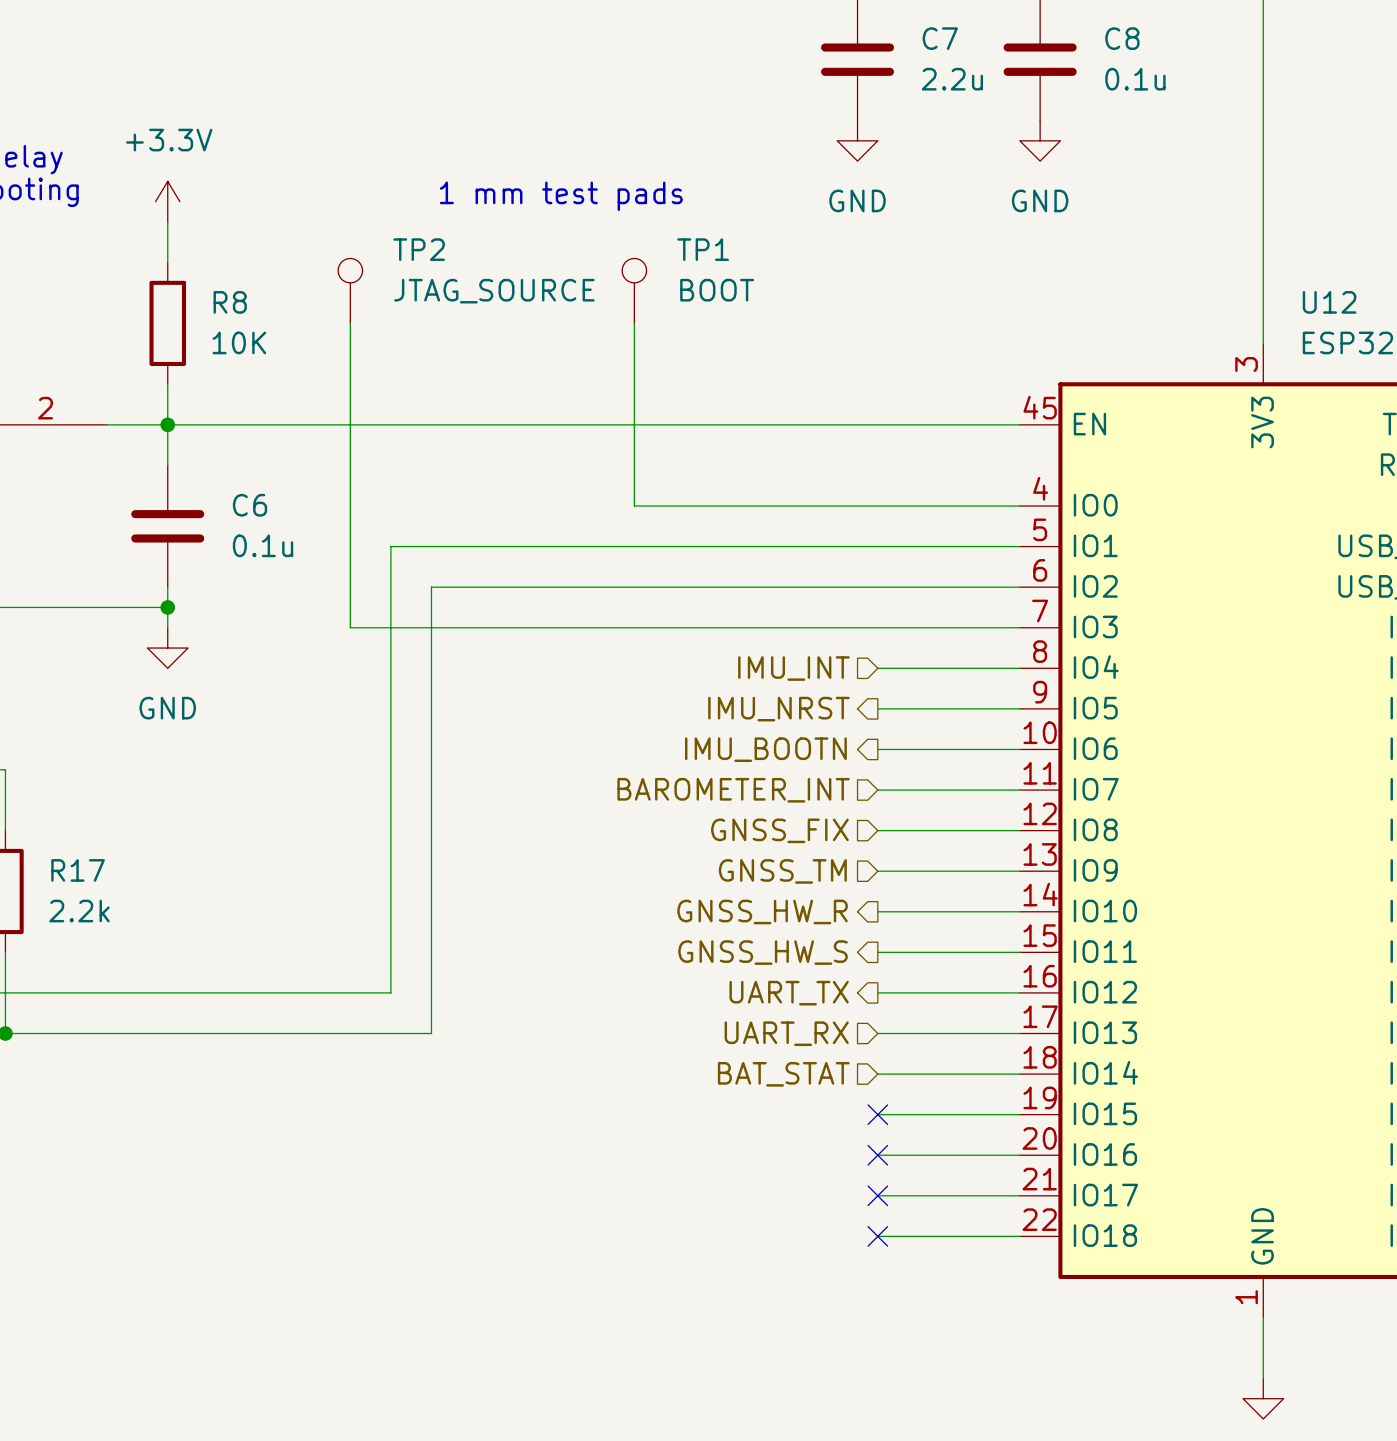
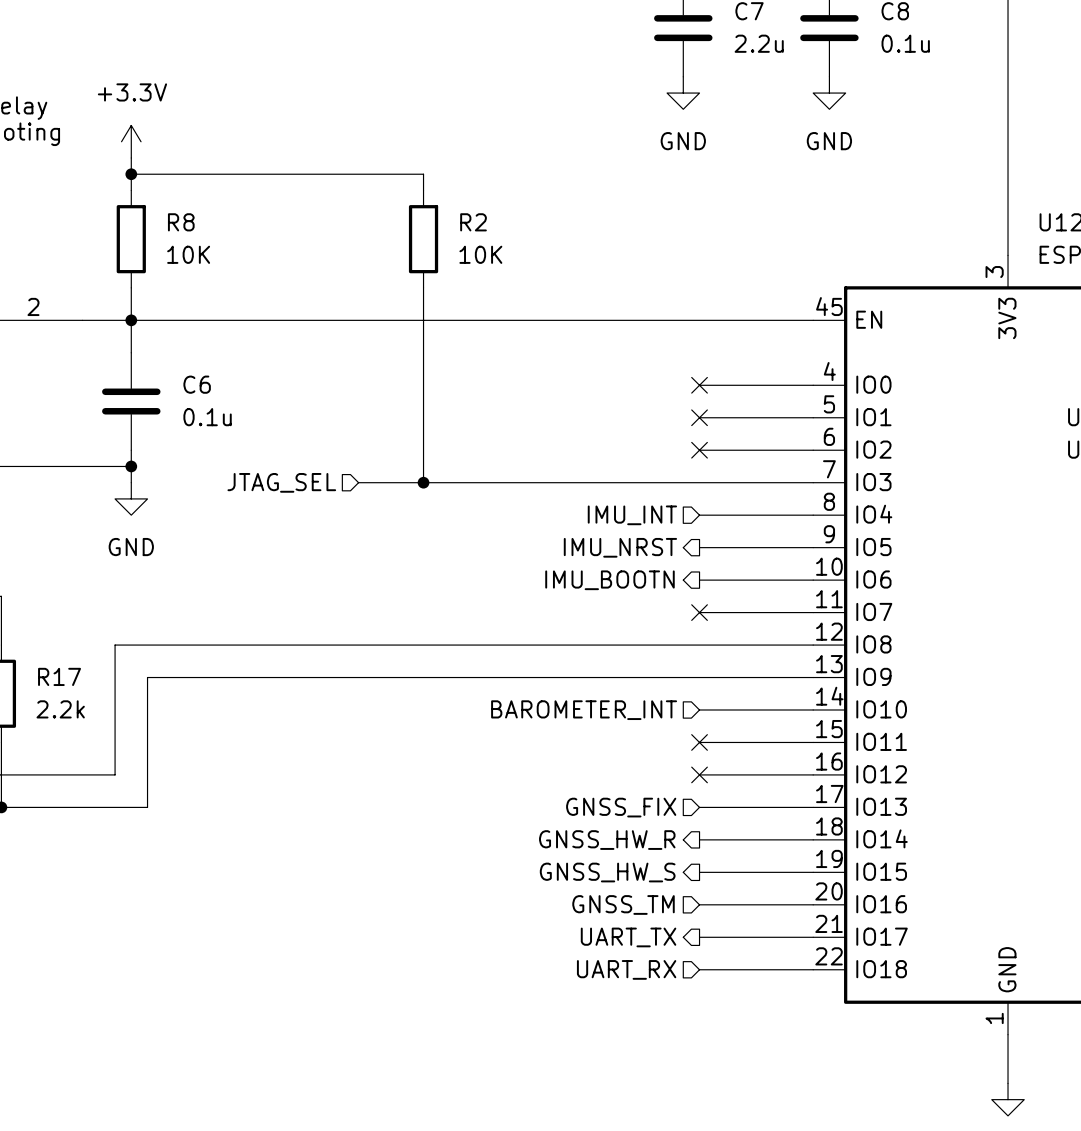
text: 1 mm test pads (561, 196) -> none
wire: none -> (131, 174) (423, 174) (423, 190)
junction: none -> (131, 174)
TP2: JTAG_SOURCE (350, 290) -> none
TP1: BOOT (634, 290) -> none
wire: (350, 323) (350, 627) (451, 627) -> none
R2: none -> 10K (423, 239)
wire: (634, 323) (634, 506) (877, 506) -> none
wire: none -> (423, 287) (423, 482)
no-connect mark: none -> (699, 385)
wire: (877, 546) (390, 546) (390, 992) (147, 992) -> (699, 645) (115, 645) (115, 774)
no-connect mark: none -> (699, 417)
wire: (877, 587) (431, 587) (431, 1033) (188, 1033) -> (699, 677) (147, 677) (147, 807)
no-connect mark: none -> (699, 450)
hierarchical label: none -> JTAG_SEL (281, 482)
junction: none -> (423, 482)
hierarchical label: BAROMETER_INT (733, 790) -> none
no-connect mark: none -> (699, 612)
hierarchical label: GNSS_FIX (779, 830) -> none
hierarchical label position: GNSS_TM (782, 871) -> GNSS_TM (623, 904)
hierarchical label shape: output (762, 911) -> input (584, 710)
hierarchical label: GNSS_HW_R (762, 911) -> BAROMETER_INT (584, 710)
hierarchical label position: GNSS_HW_S (763, 952) -> GNSS_HW_S (607, 872)
no-connect mark: none -> (699, 742)
no-connect mark: none -> (699, 774)
hierarchical label position: UART_TX (789, 993) -> UART_TX (628, 937)
hierarchical label: UART_RX (786, 1033) -> GNSS_FIX (621, 807)
hierarchical label shape: input (783, 1074) -> output (607, 840)
hierarchical label: BAT_STAT (783, 1074) -> GNSS_HW_R (607, 840)
no-connect mark: (877, 1114) -> none
no-connect mark: (877, 1155) -> none
no-connect mark: (877, 1195) -> none
hierarchical label: none -> UART_RX (626, 969)
no-connect mark: (877, 1236) -> none

